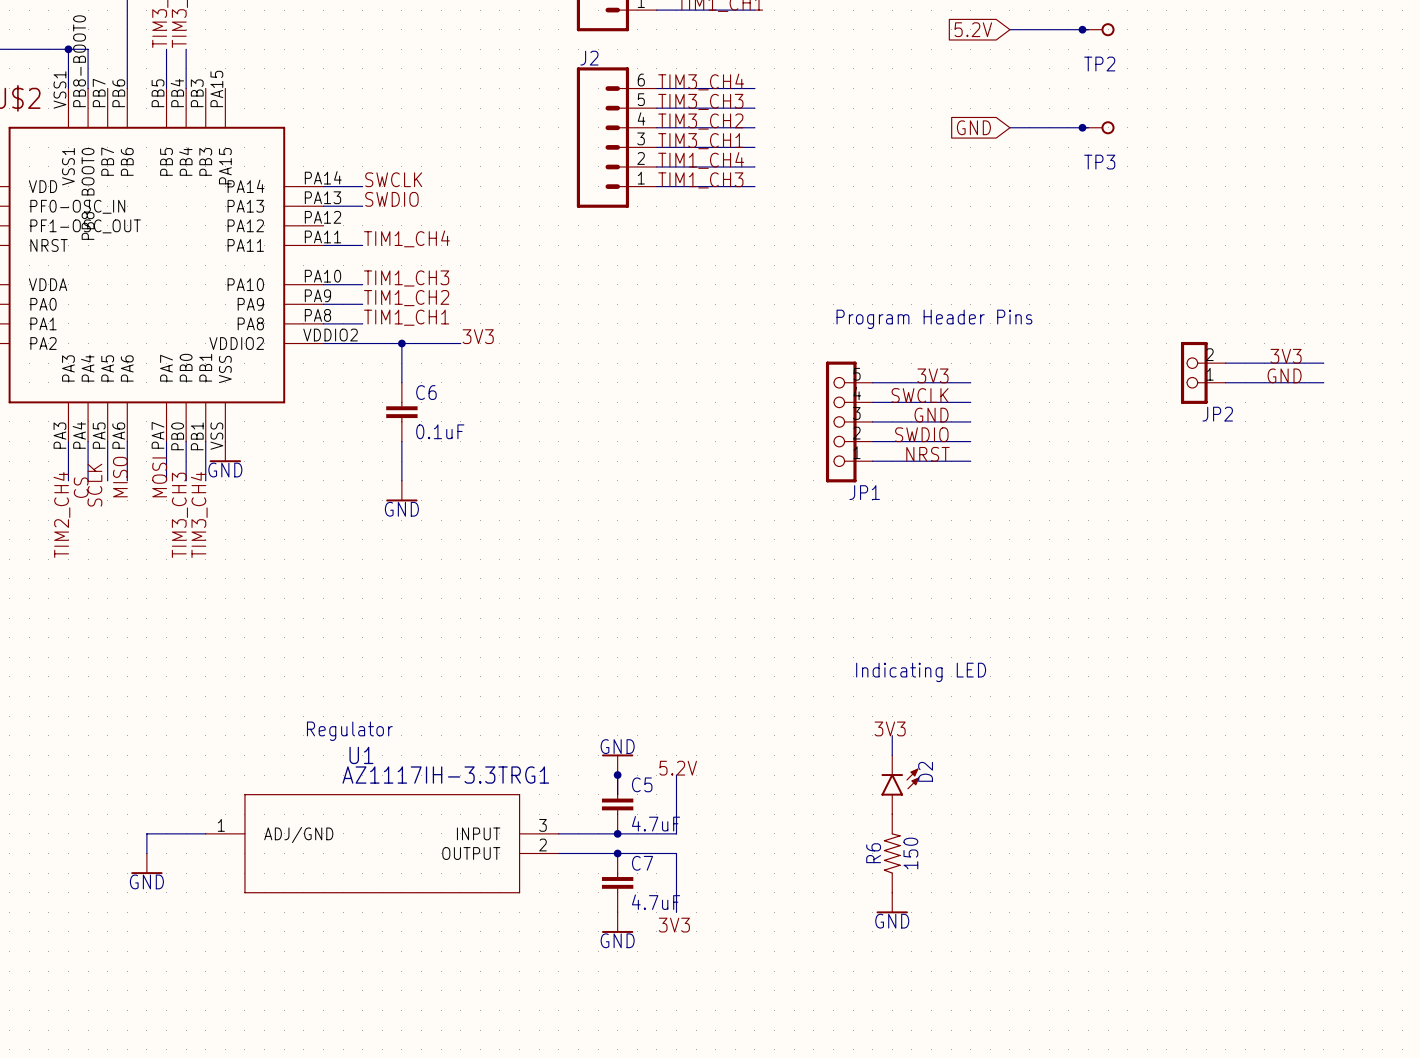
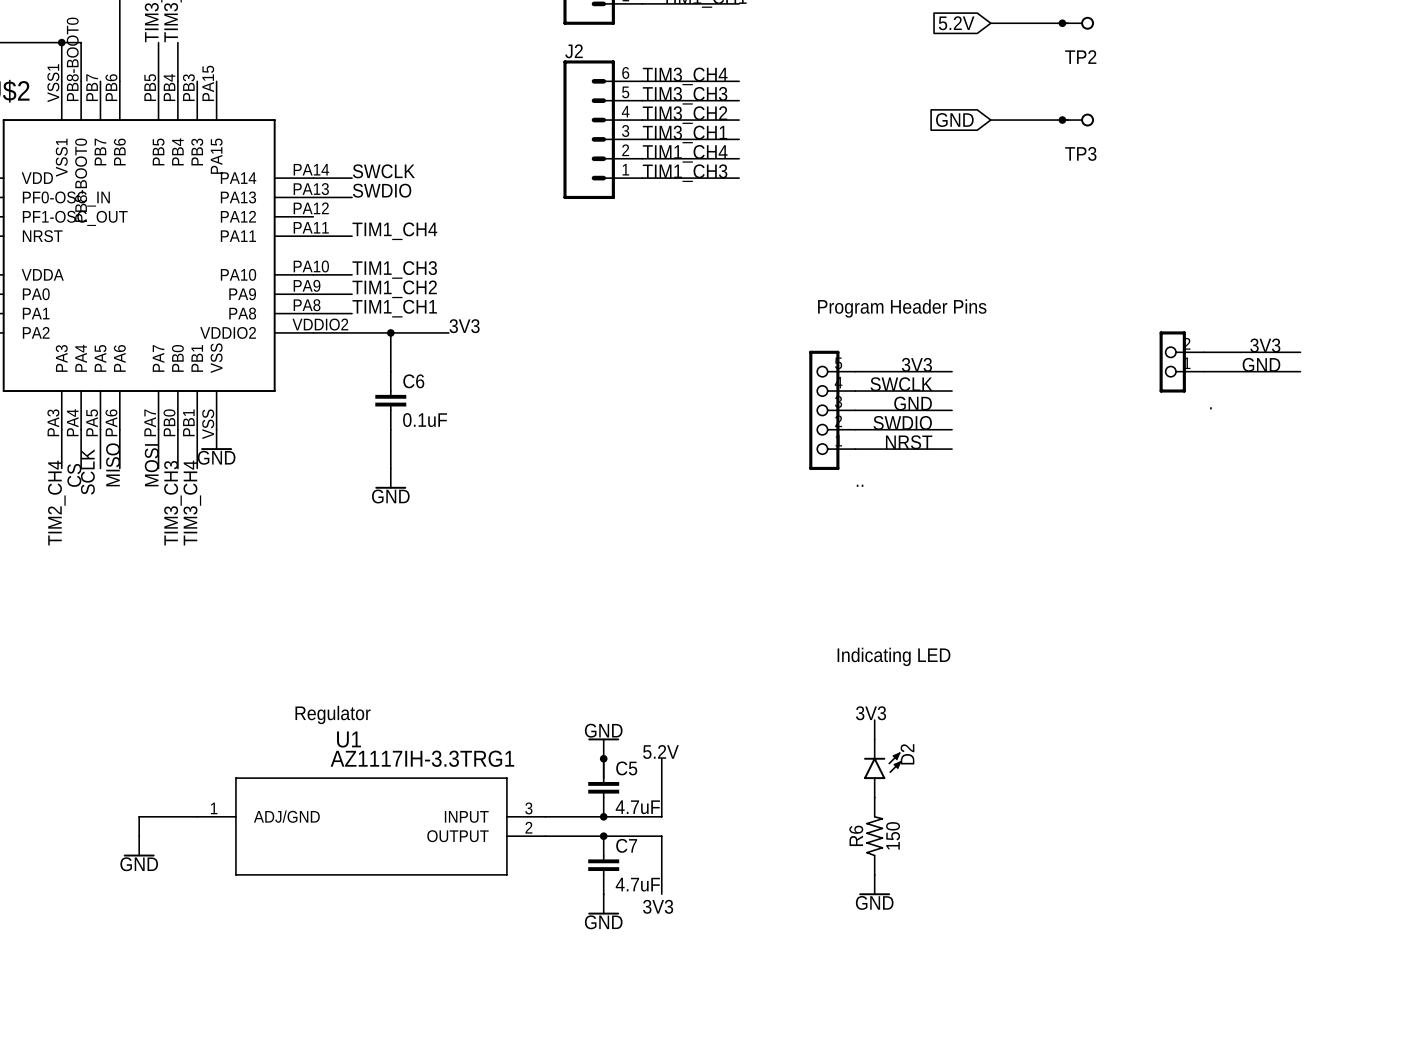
JP2 name: JP2 (1217, 414) -> . (1210, 408)
JP1 name: JP1 (864, 492) -> .. (860, 485)

